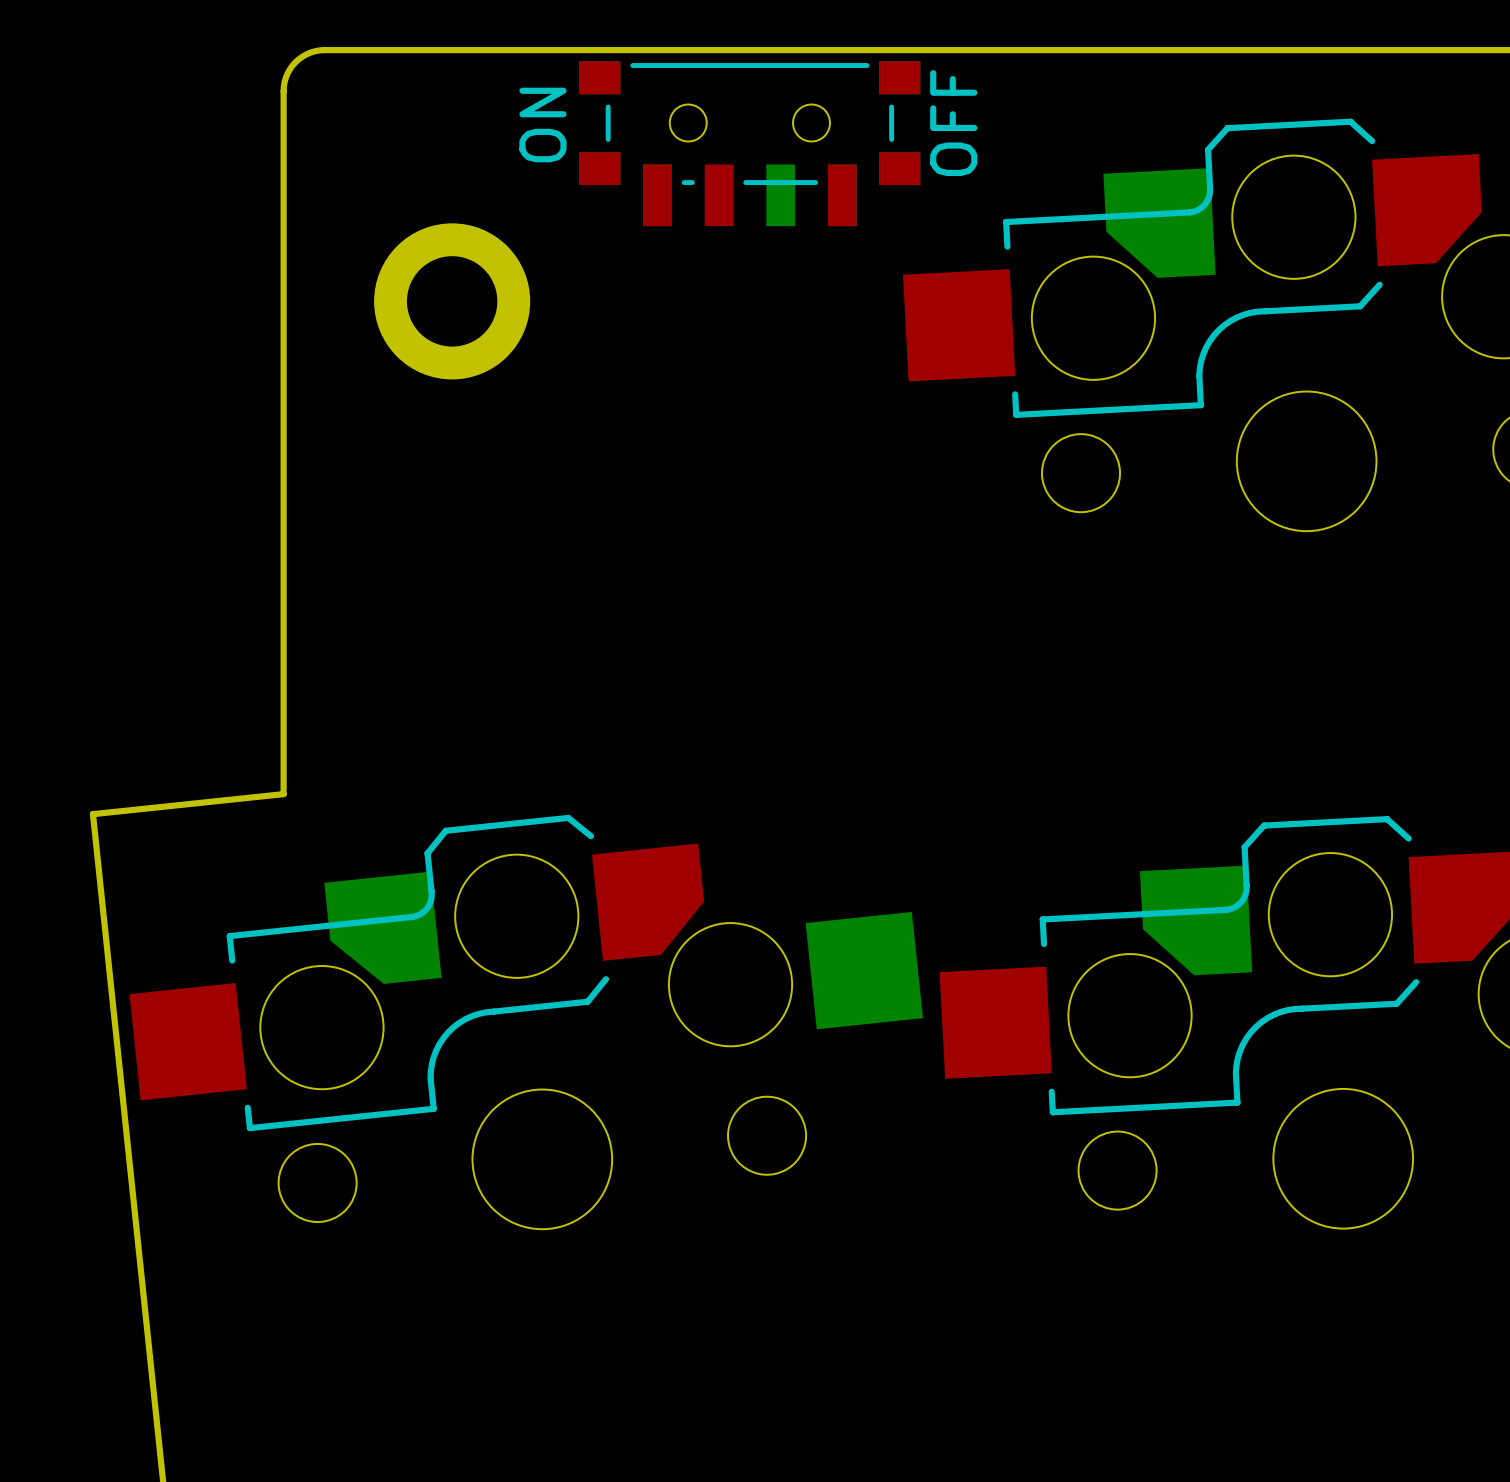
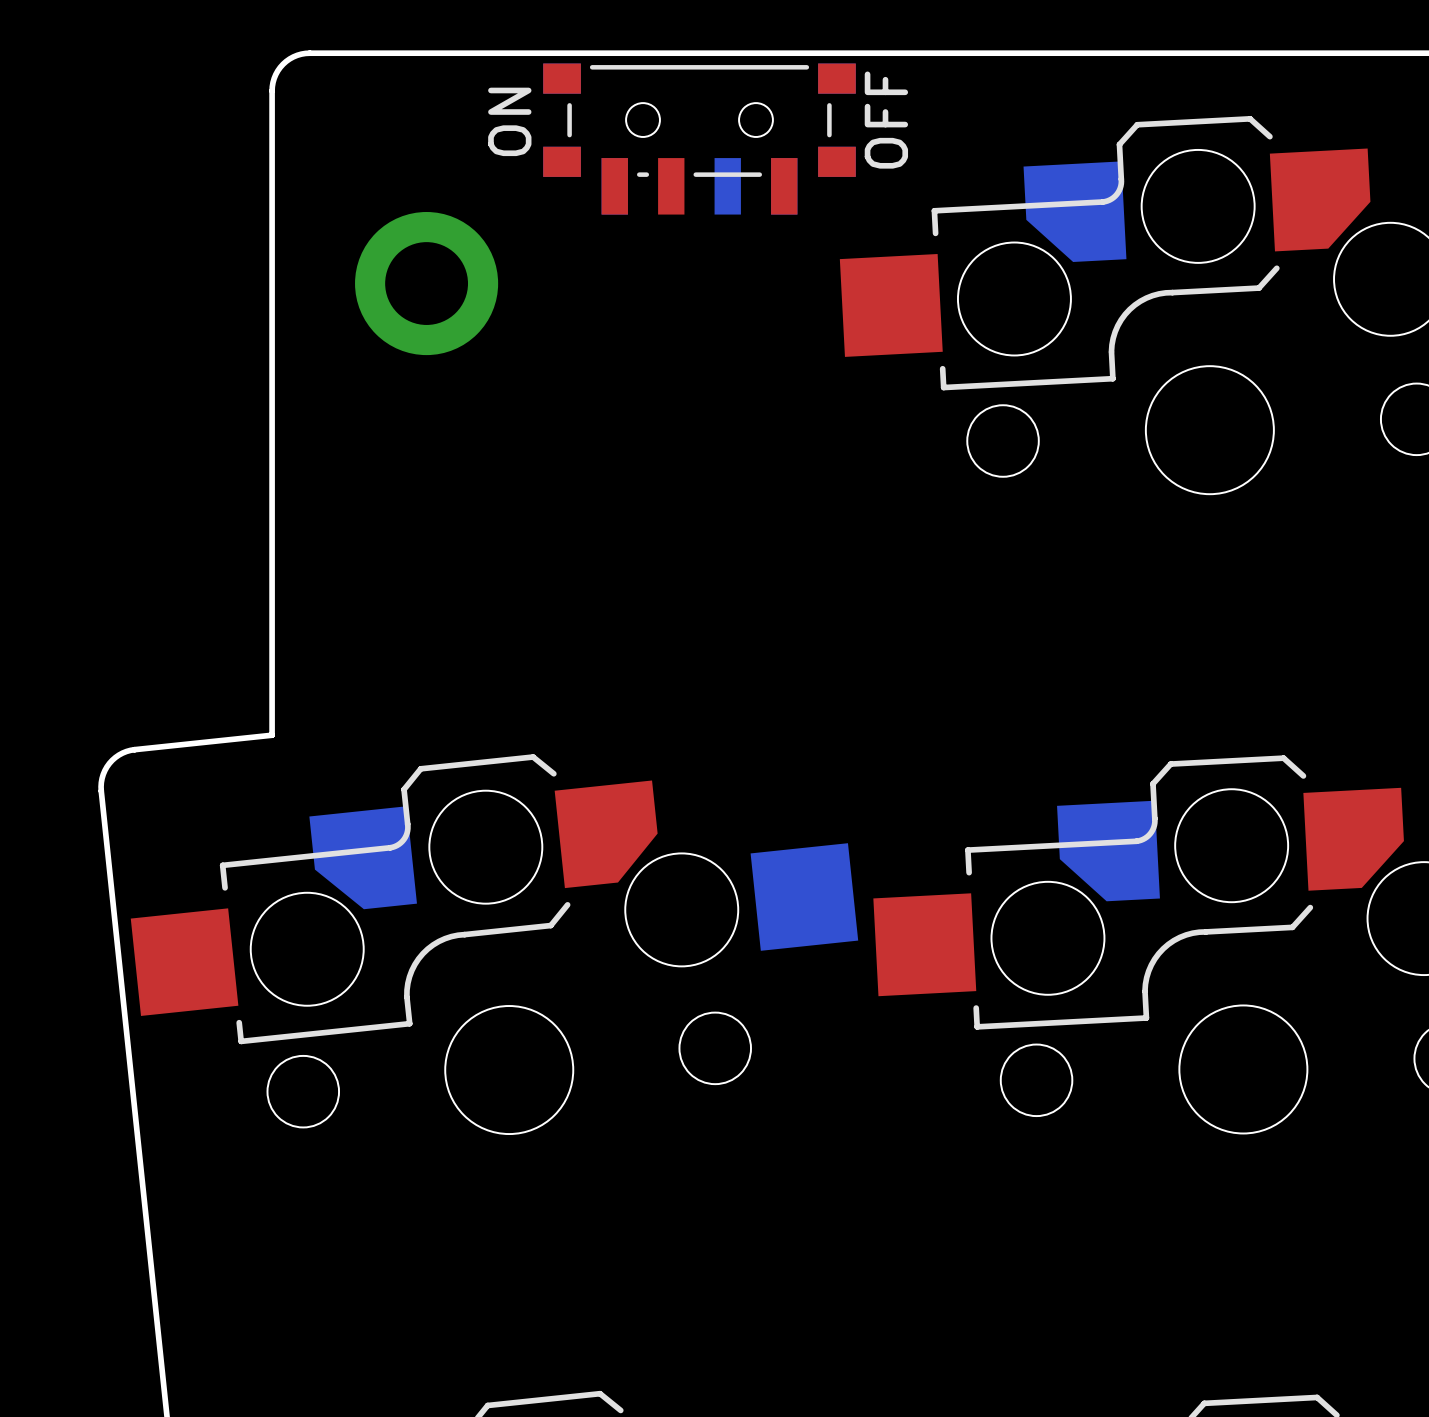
board edge: (133, 809) (92, 814) (97, 855) -> (134, 749) (118, 755) (109, 763) (102, 778) (101, 791)

